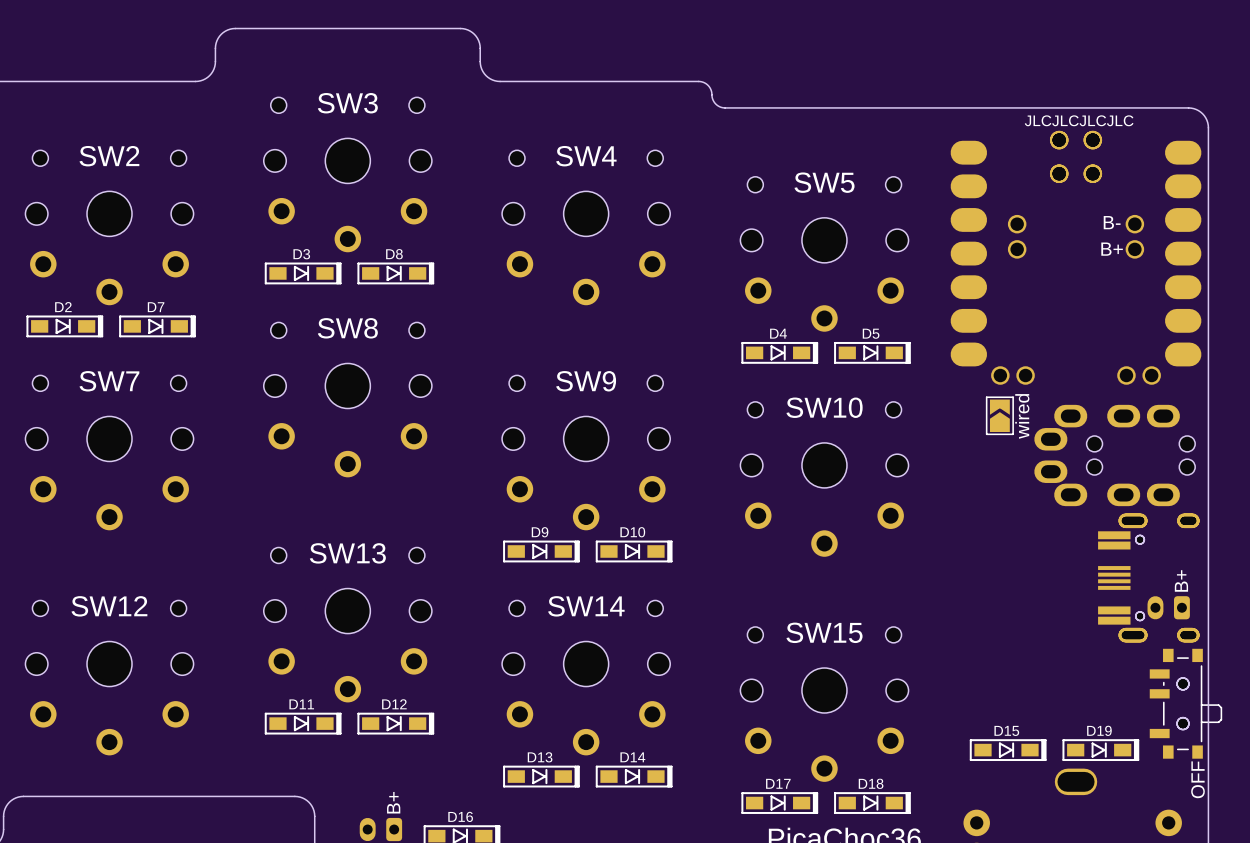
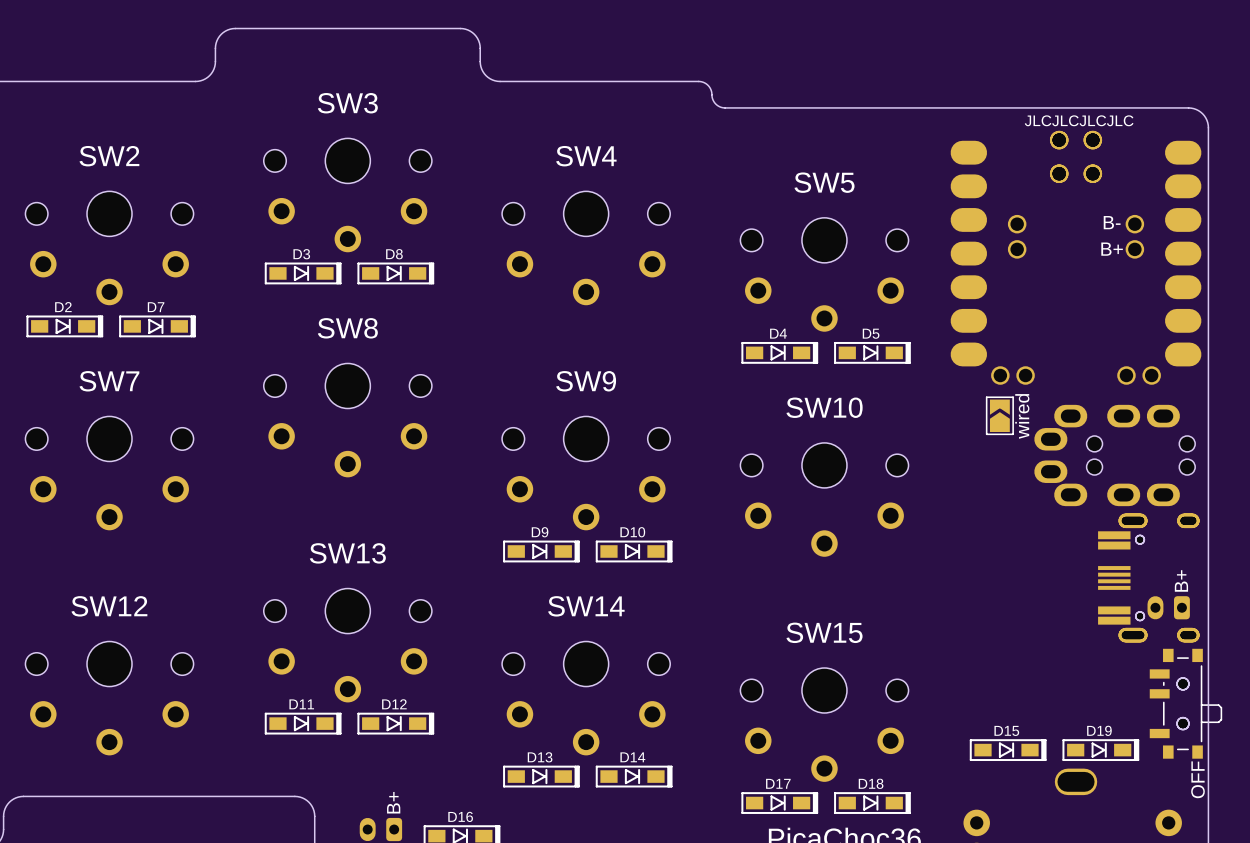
SW3 footprint: [263, 97, 432, 253] -> [263, 138, 432, 253]
SW2 footprint: [25, 150, 194, 306] -> [25, 191, 194, 306]
SW4 footprint: [502, 150, 671, 306] -> [502, 191, 671, 306]
SW5 footprint: [740, 176, 909, 332] -> [740, 217, 909, 332]
SW8 footprint: [263, 322, 432, 478] -> [263, 363, 432, 478]
SW7 footprint: [25, 375, 194, 531] -> [25, 416, 194, 531]
SW9 footprint: [502, 375, 671, 531] -> [502, 416, 671, 531]
SW10 footprint: [740, 401, 909, 557] -> [740, 442, 909, 557]
SW13 footprint: [263, 547, 432, 703] -> [263, 588, 432, 703]
SW12 footprint: [25, 600, 194, 756] -> [25, 641, 194, 756]
SW14 footprint: [502, 600, 671, 756] -> [502, 641, 671, 756]
SW15 footprint: [740, 626, 909, 782] -> [740, 668, 909, 782]

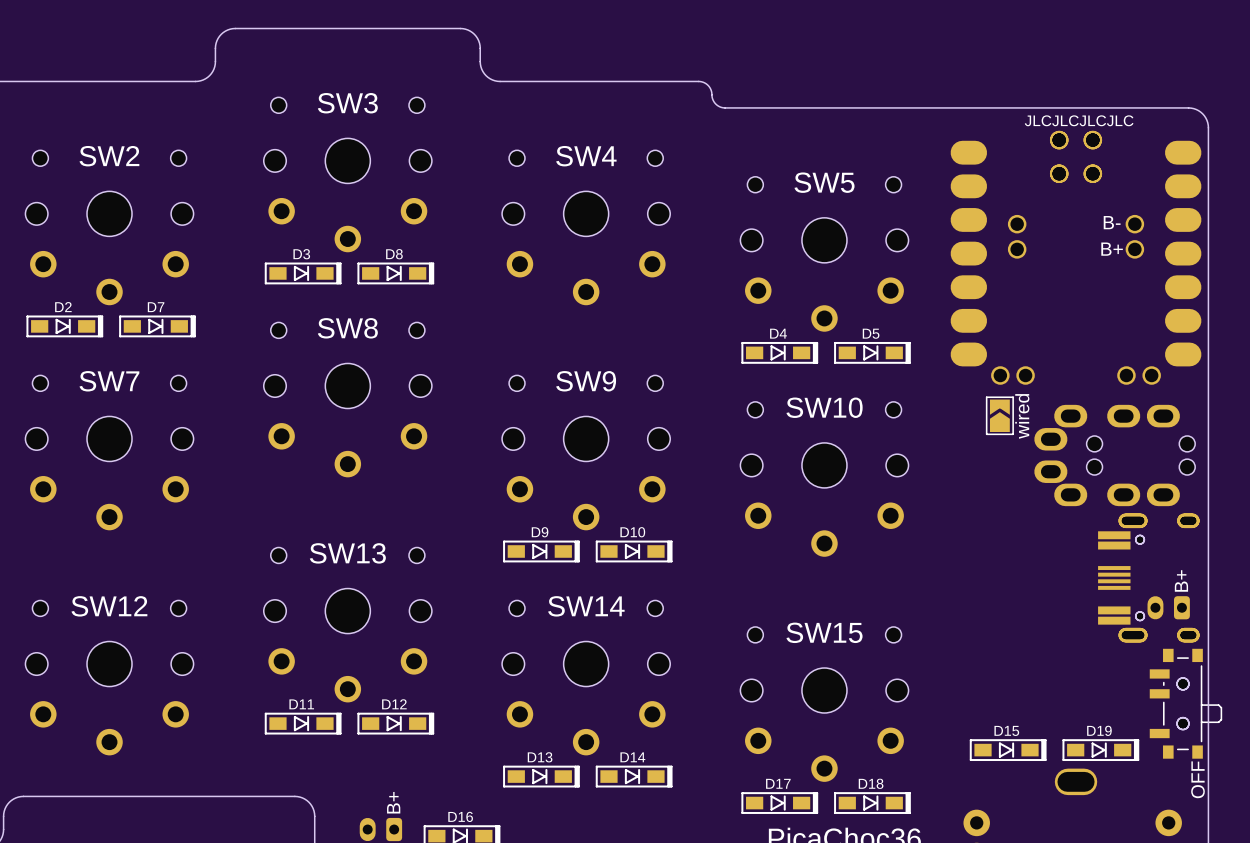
SW3 footprint: [263, 138, 432, 253] -> [263, 97, 432, 253]
SW2 footprint: [25, 191, 194, 306] -> [25, 150, 194, 306]
SW4 footprint: [502, 191, 671, 306] -> [502, 150, 671, 306]
SW5 footprint: [740, 217, 909, 332] -> [740, 176, 909, 332]
SW8 footprint: [263, 363, 432, 478] -> [263, 322, 432, 478]
SW7 footprint: [25, 416, 194, 531] -> [25, 375, 194, 531]
SW9 footprint: [502, 416, 671, 531] -> [502, 375, 671, 531]
SW10 footprint: [740, 442, 909, 557] -> [740, 401, 909, 557]
SW13 footprint: [263, 588, 432, 703] -> [263, 547, 432, 703]
SW12 footprint: [25, 641, 194, 756] -> [25, 600, 194, 756]
SW14 footprint: [502, 641, 671, 756] -> [502, 600, 671, 756]
SW15 footprint: [740, 668, 909, 782] -> [740, 626, 909, 782]

